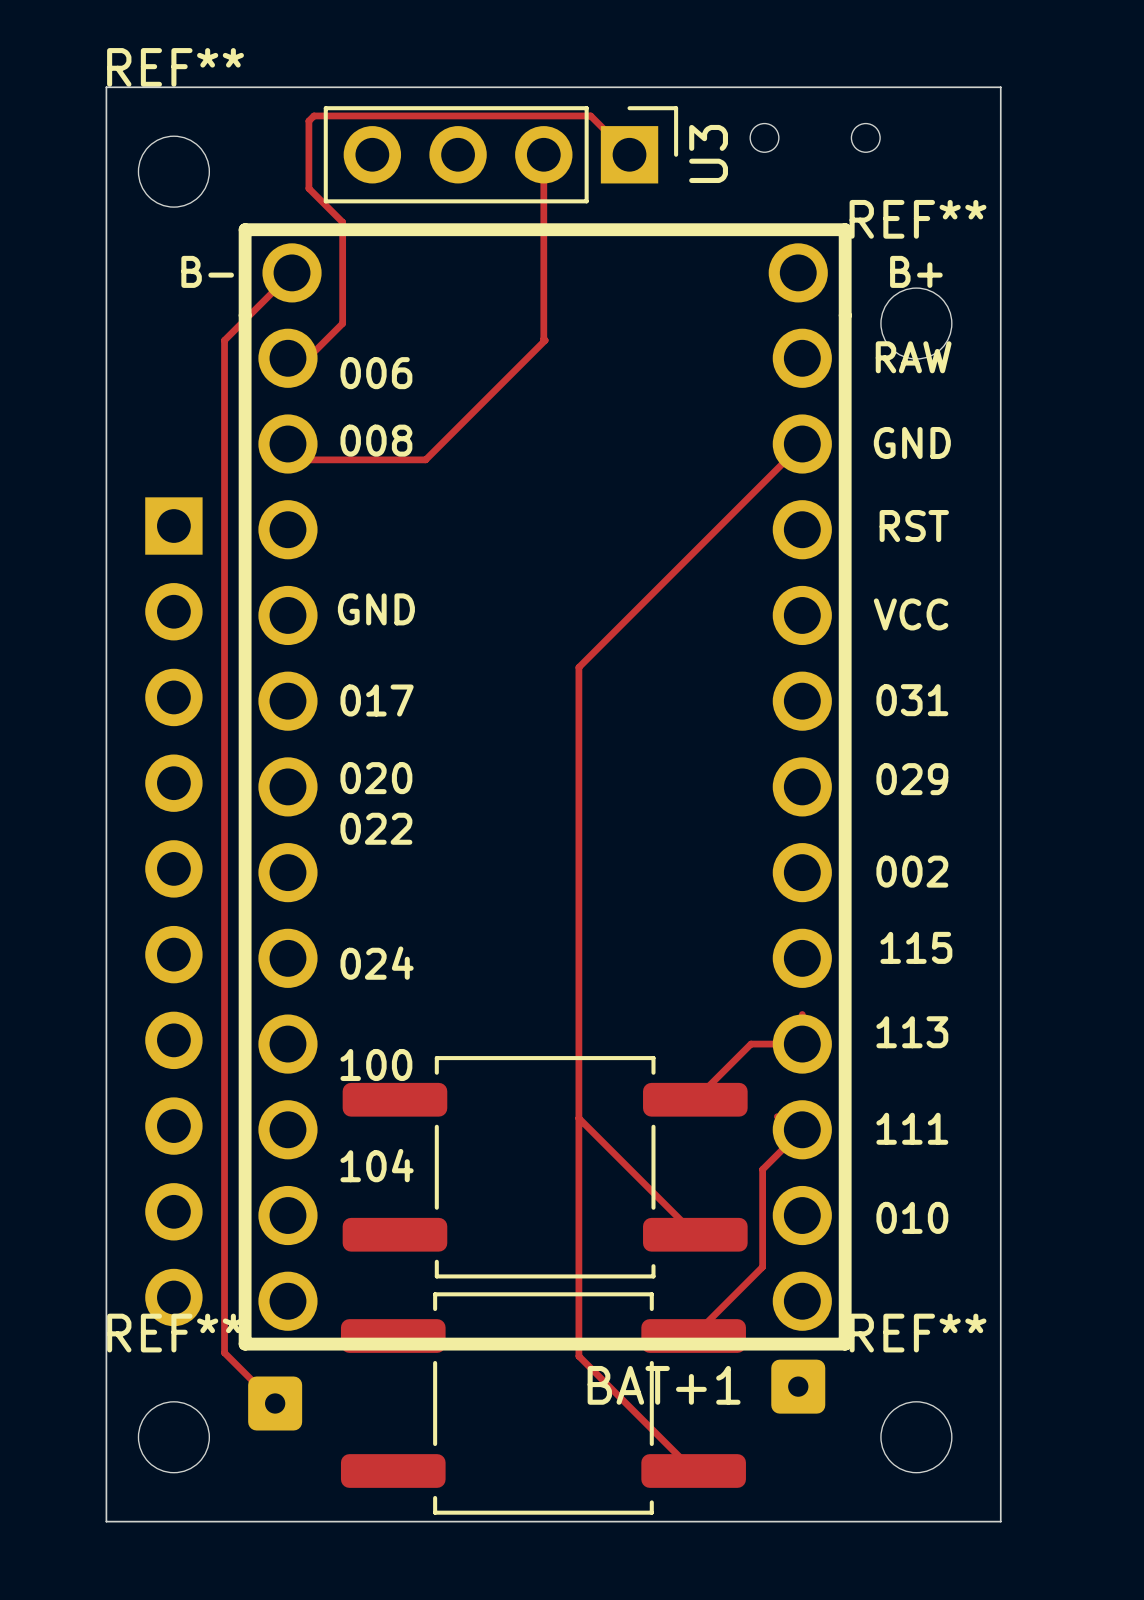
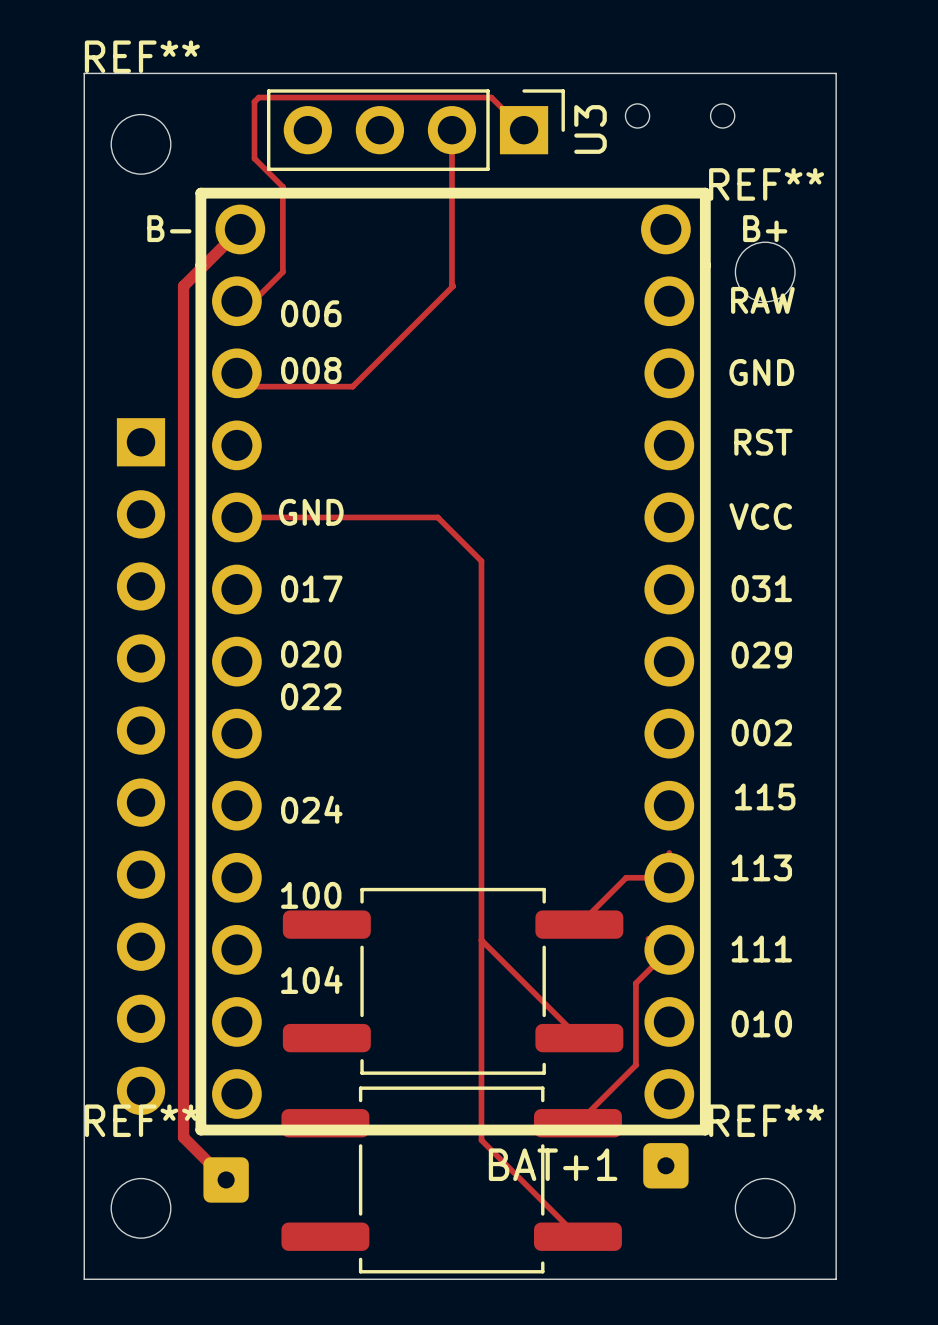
track width: thin (292, 272) (224, 340) (224, 1352) (275, 1403) -> thick (240, 229) (183, 286) (183, 1137) (226, 1179)
track: (802, 444) (578, 667) -> (236, 517) (437, 517) (481, 561)

